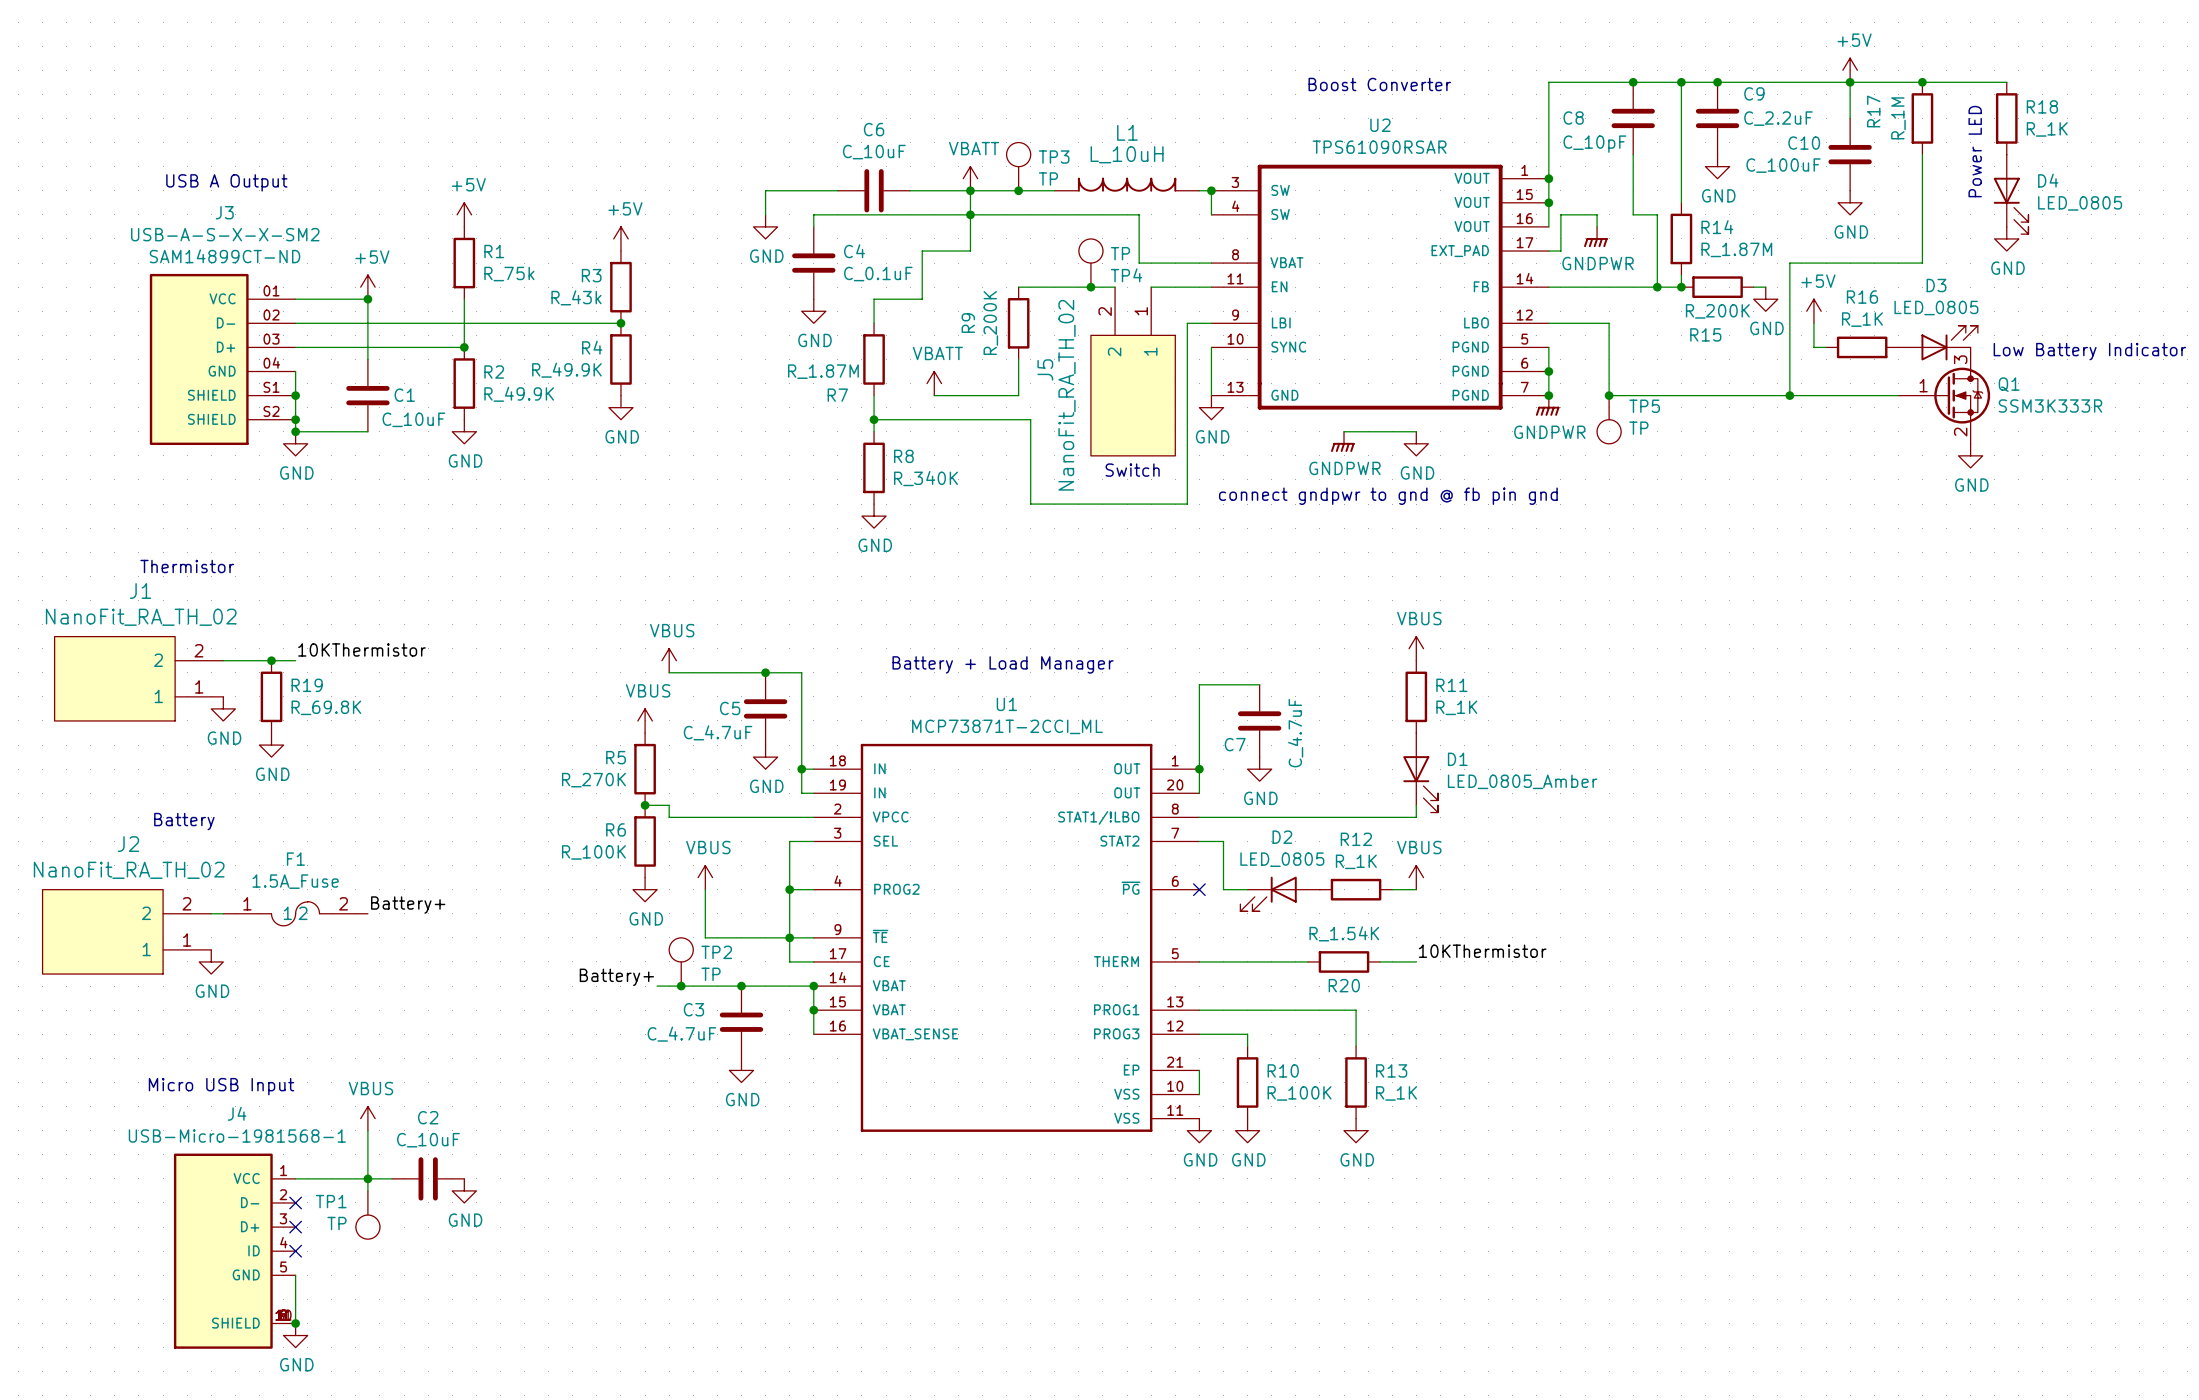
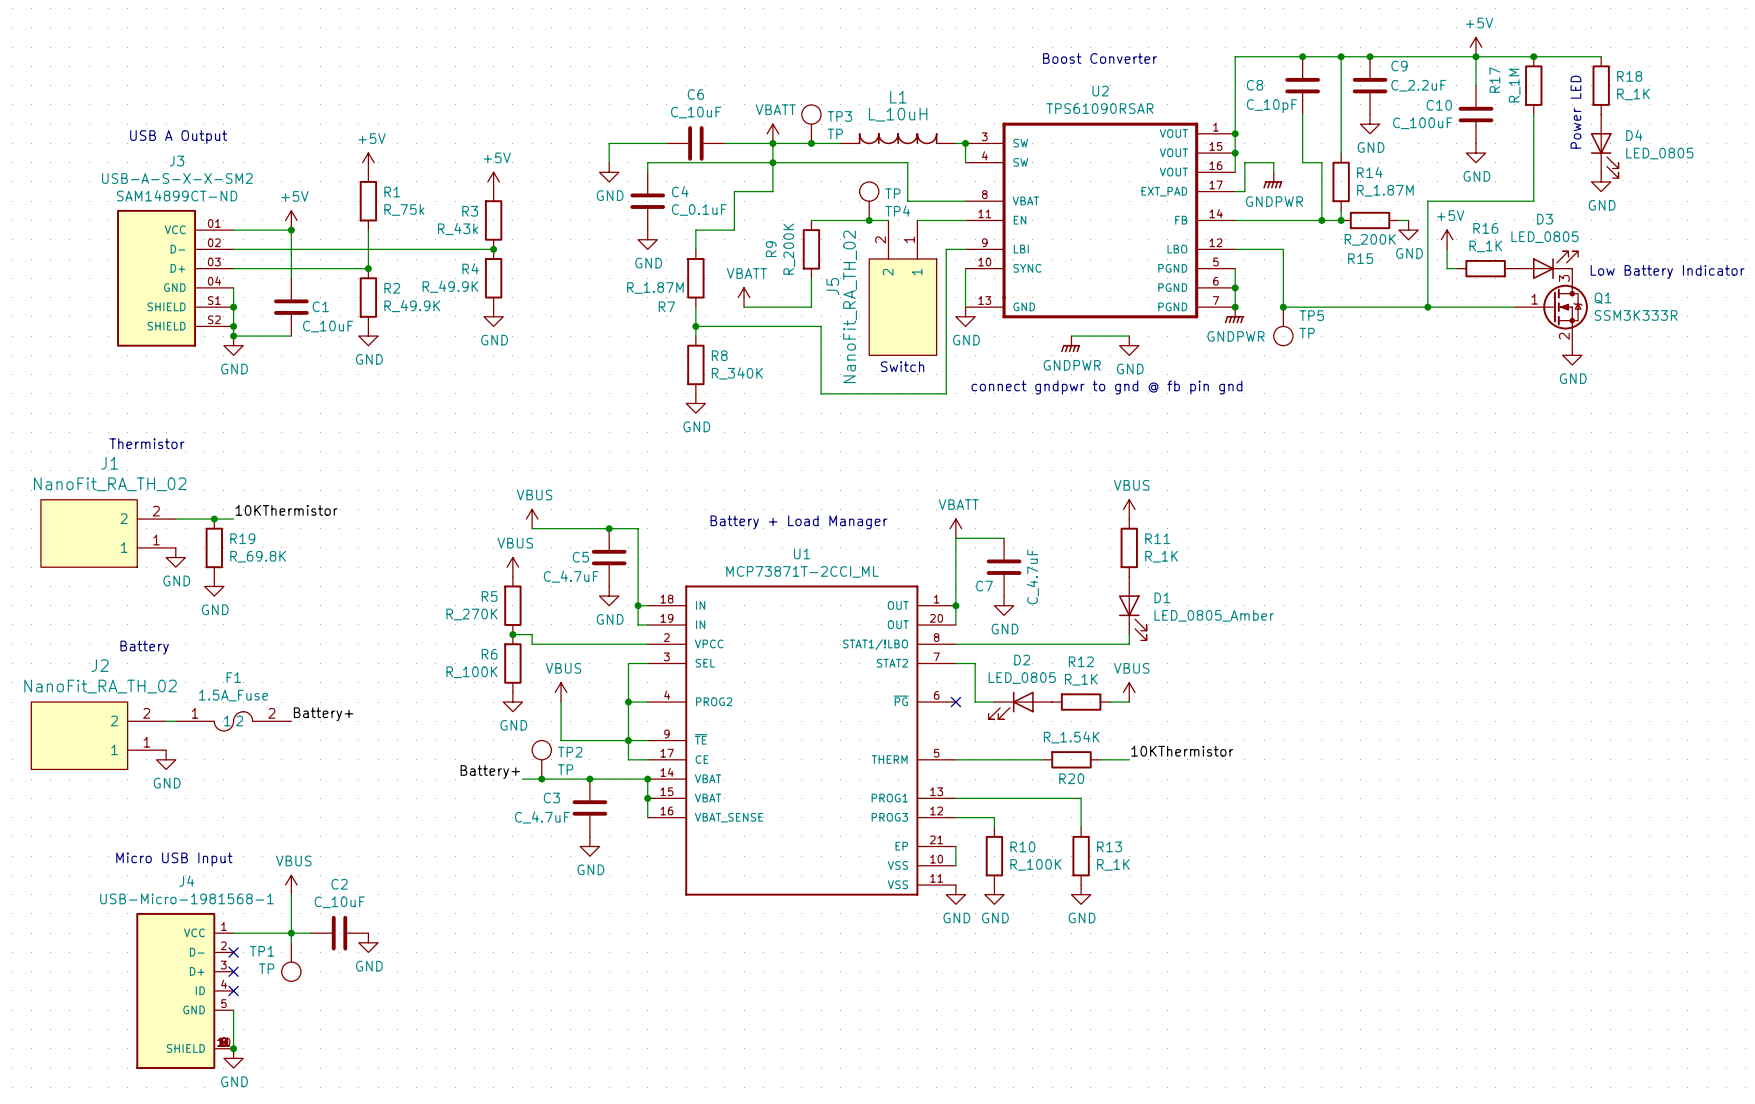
power symbol: none -> VBATT (955, 528)

